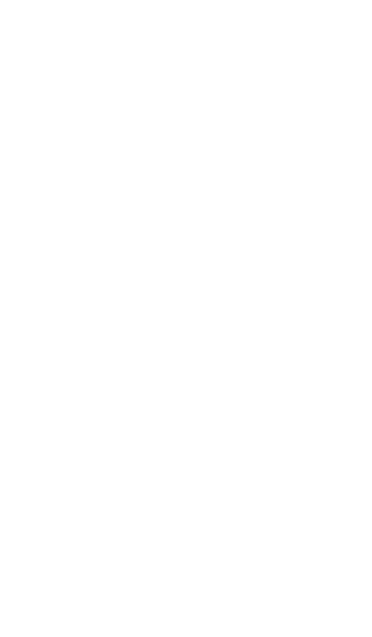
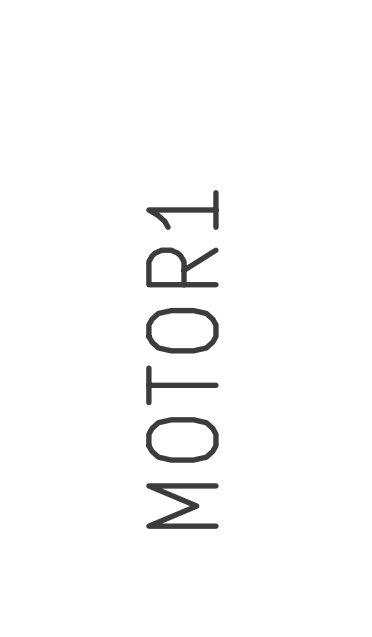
text: none -> MOTOR1 (182, 359)

